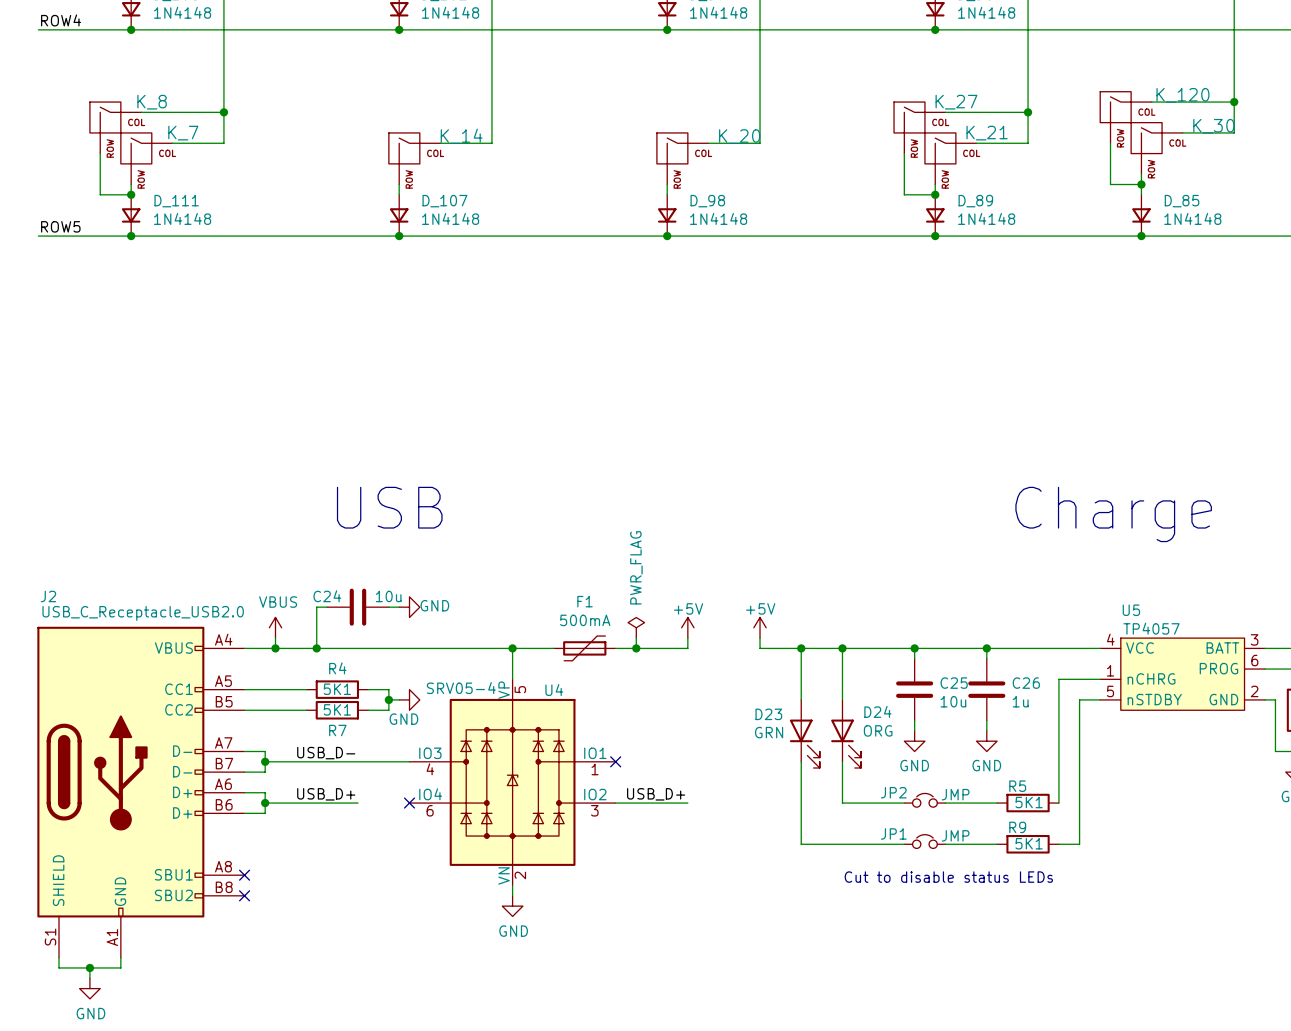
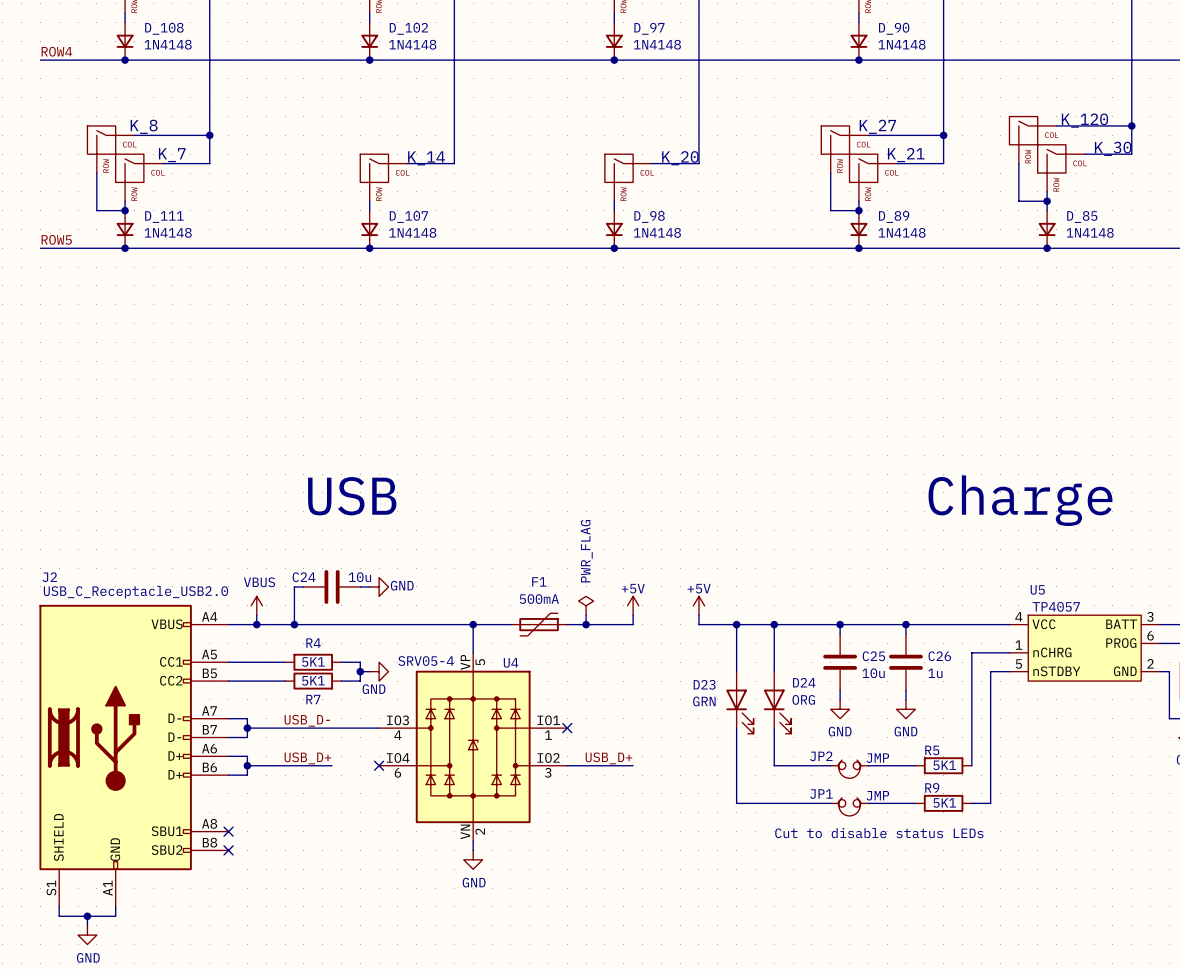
J2 symbol: [37, 626, 245, 958] -> [39, 604, 229, 907]
JP2 symbol: [904, 793, 946, 808] -> [830, 760, 869, 779]
JP1 symbol: [904, 834, 946, 849] -> [830, 797, 869, 816]

